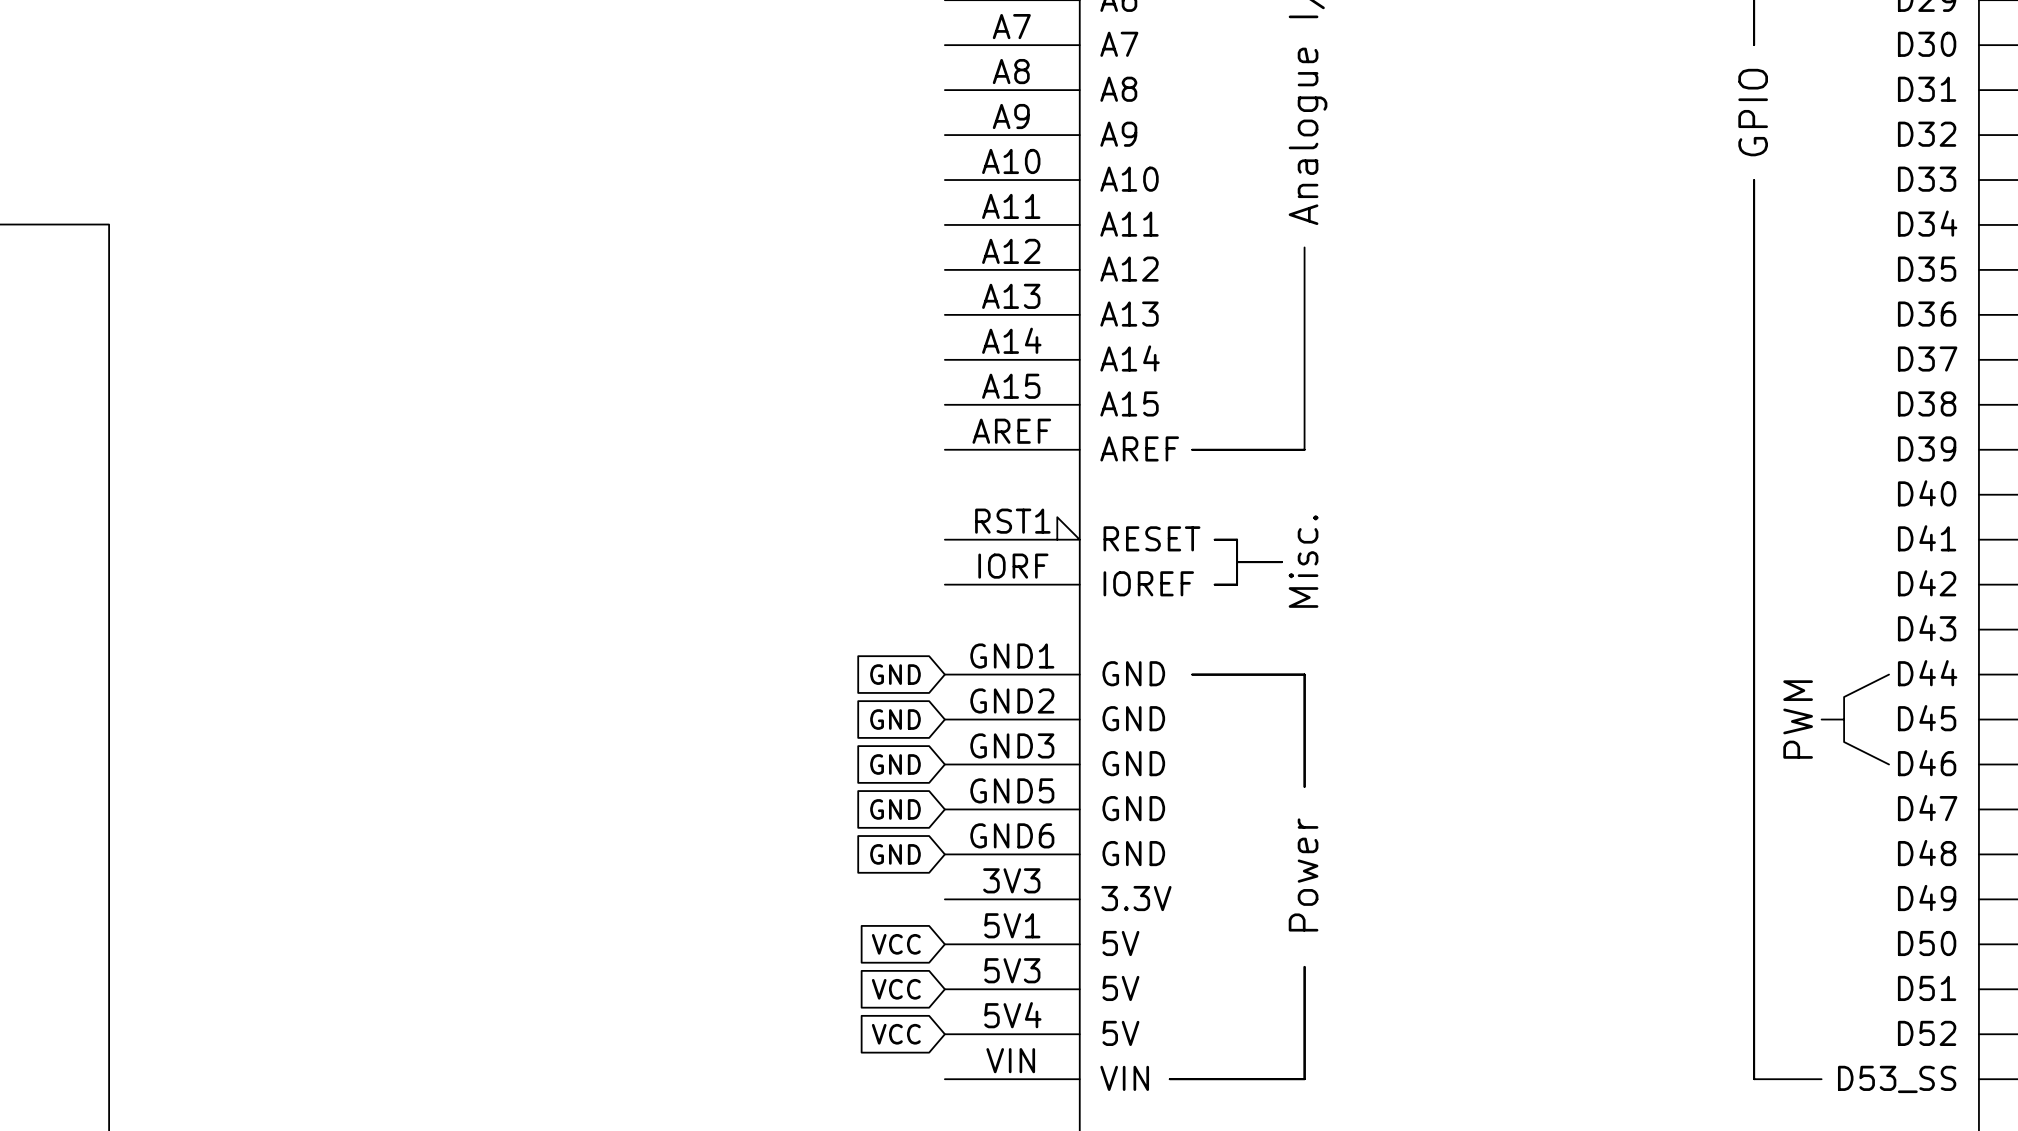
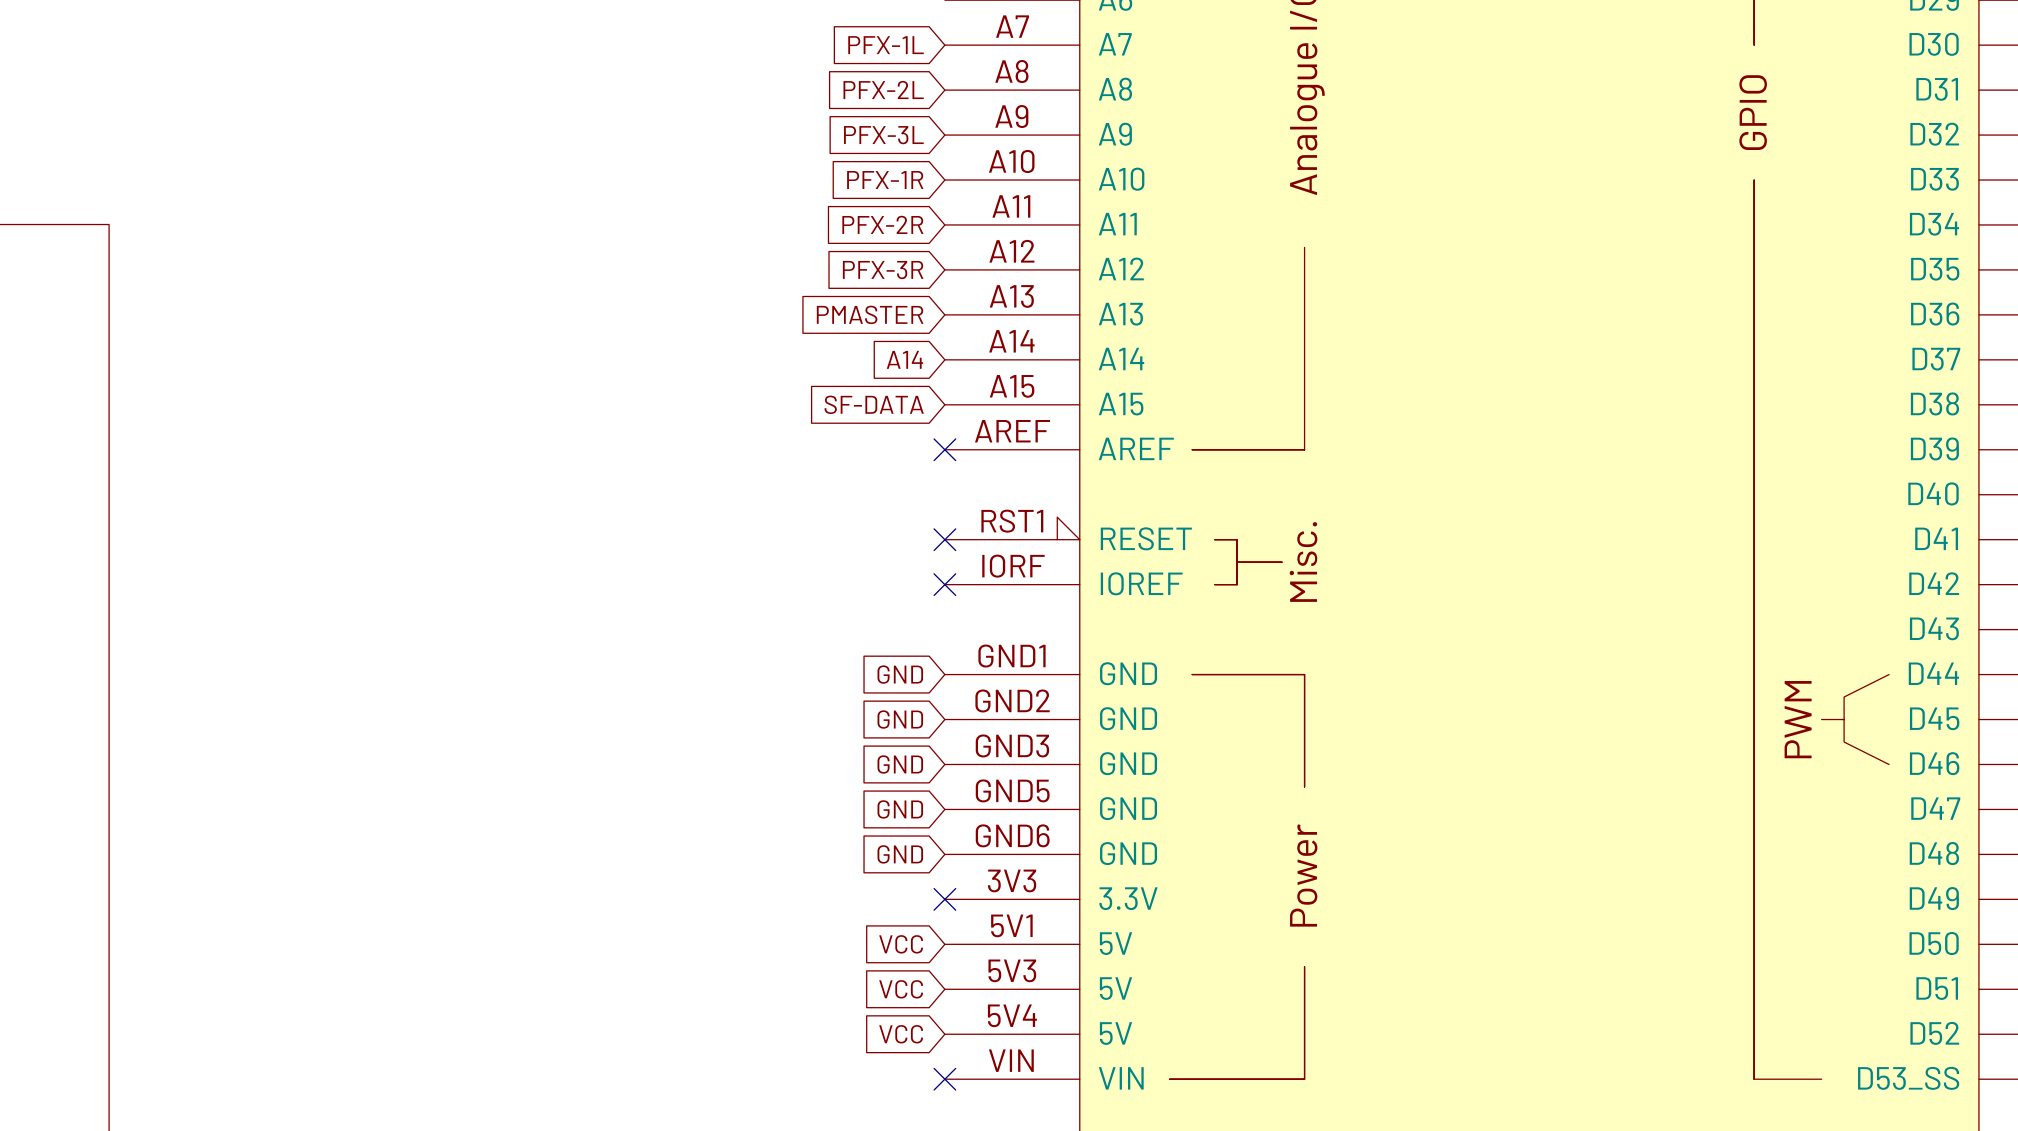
global label: none -> PFX-1L (885, 45)
global label: none -> PFX-2L (883, 89)
global label: none -> PFX-3L (883, 135)
global label: none -> PFX-1R (885, 180)
global label: none -> PFX-2R (882, 224)
global label: none -> PFX-3R (883, 270)
global label: none -> PMASTER (870, 314)
global label: none -> A14 (904, 359)
global label: none -> SF-DATA (874, 404)
no-connect mark: none -> (944, 449)
no-connect mark: none -> (944, 539)
no-connect mark: none -> (944, 584)
no-connect mark: none -> (944, 899)
no-connect mark: none -> (944, 1079)

